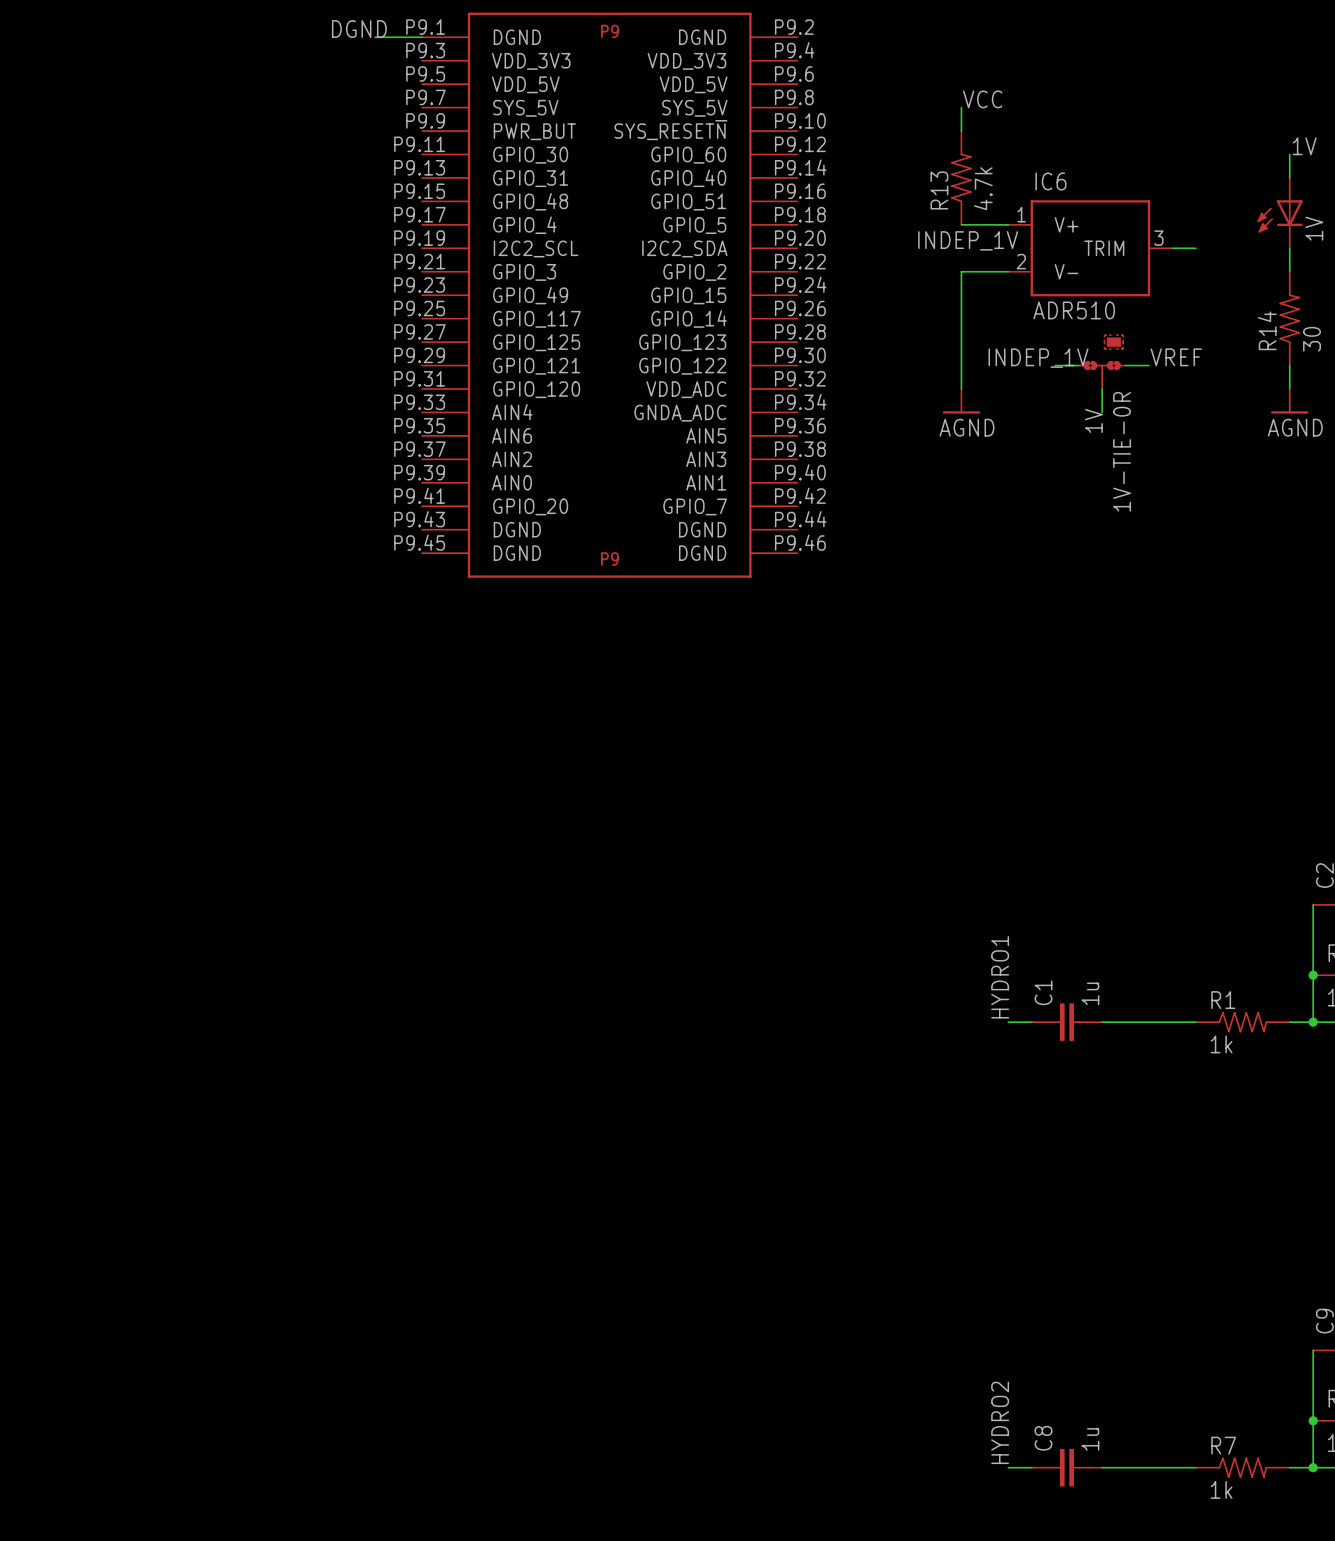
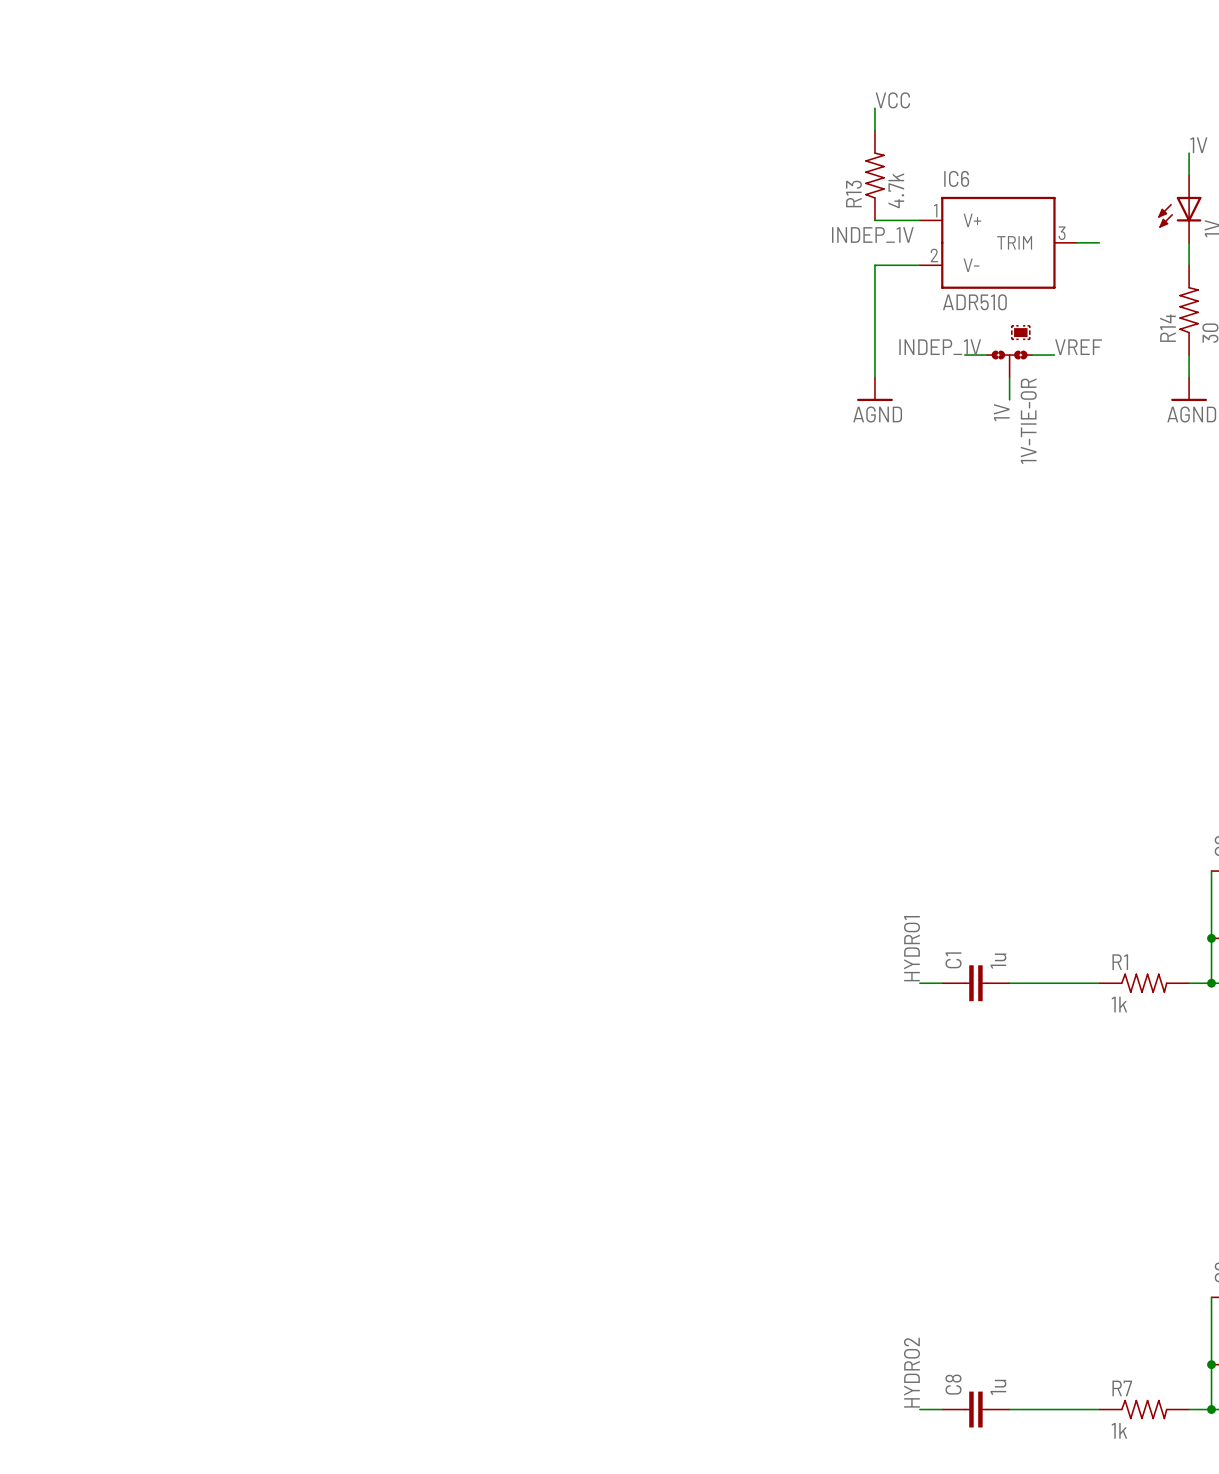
label: DGND (359, 29) -> none
wire: (375, 37) (422, 37) -> none
part: (609, 295) -> none

